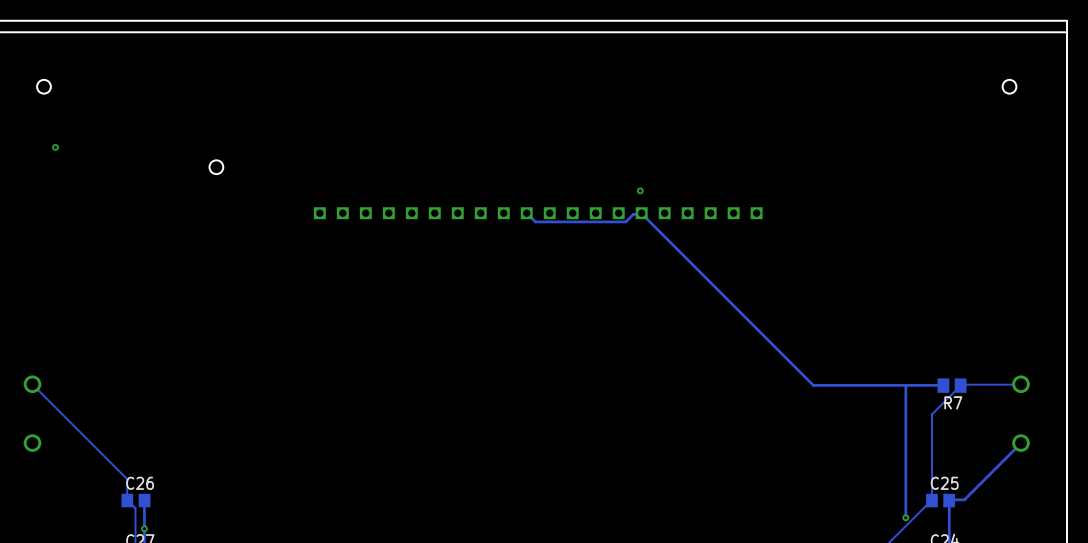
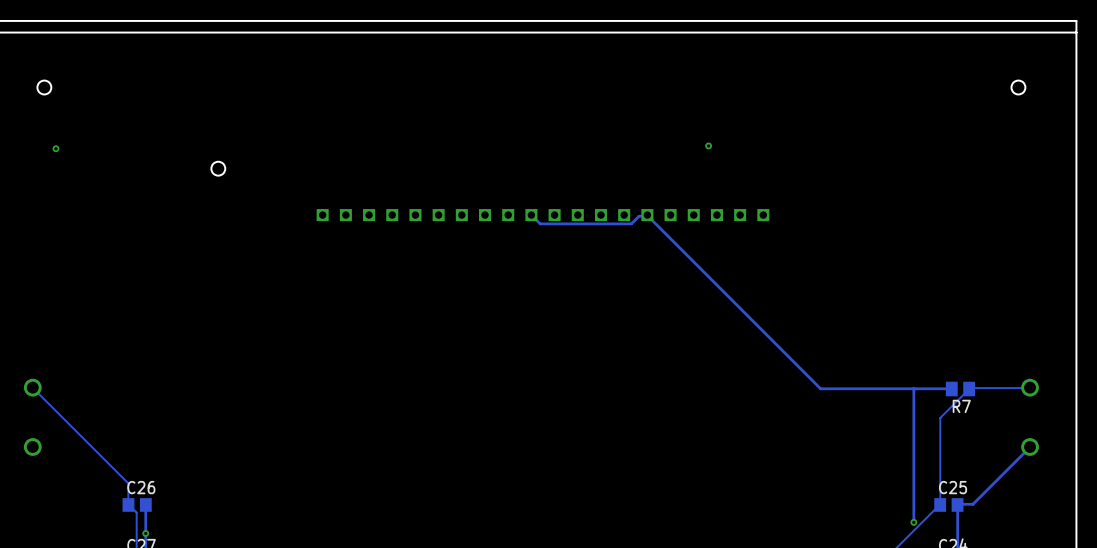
via: none -> (708, 145)
via: (640, 190) -> none

